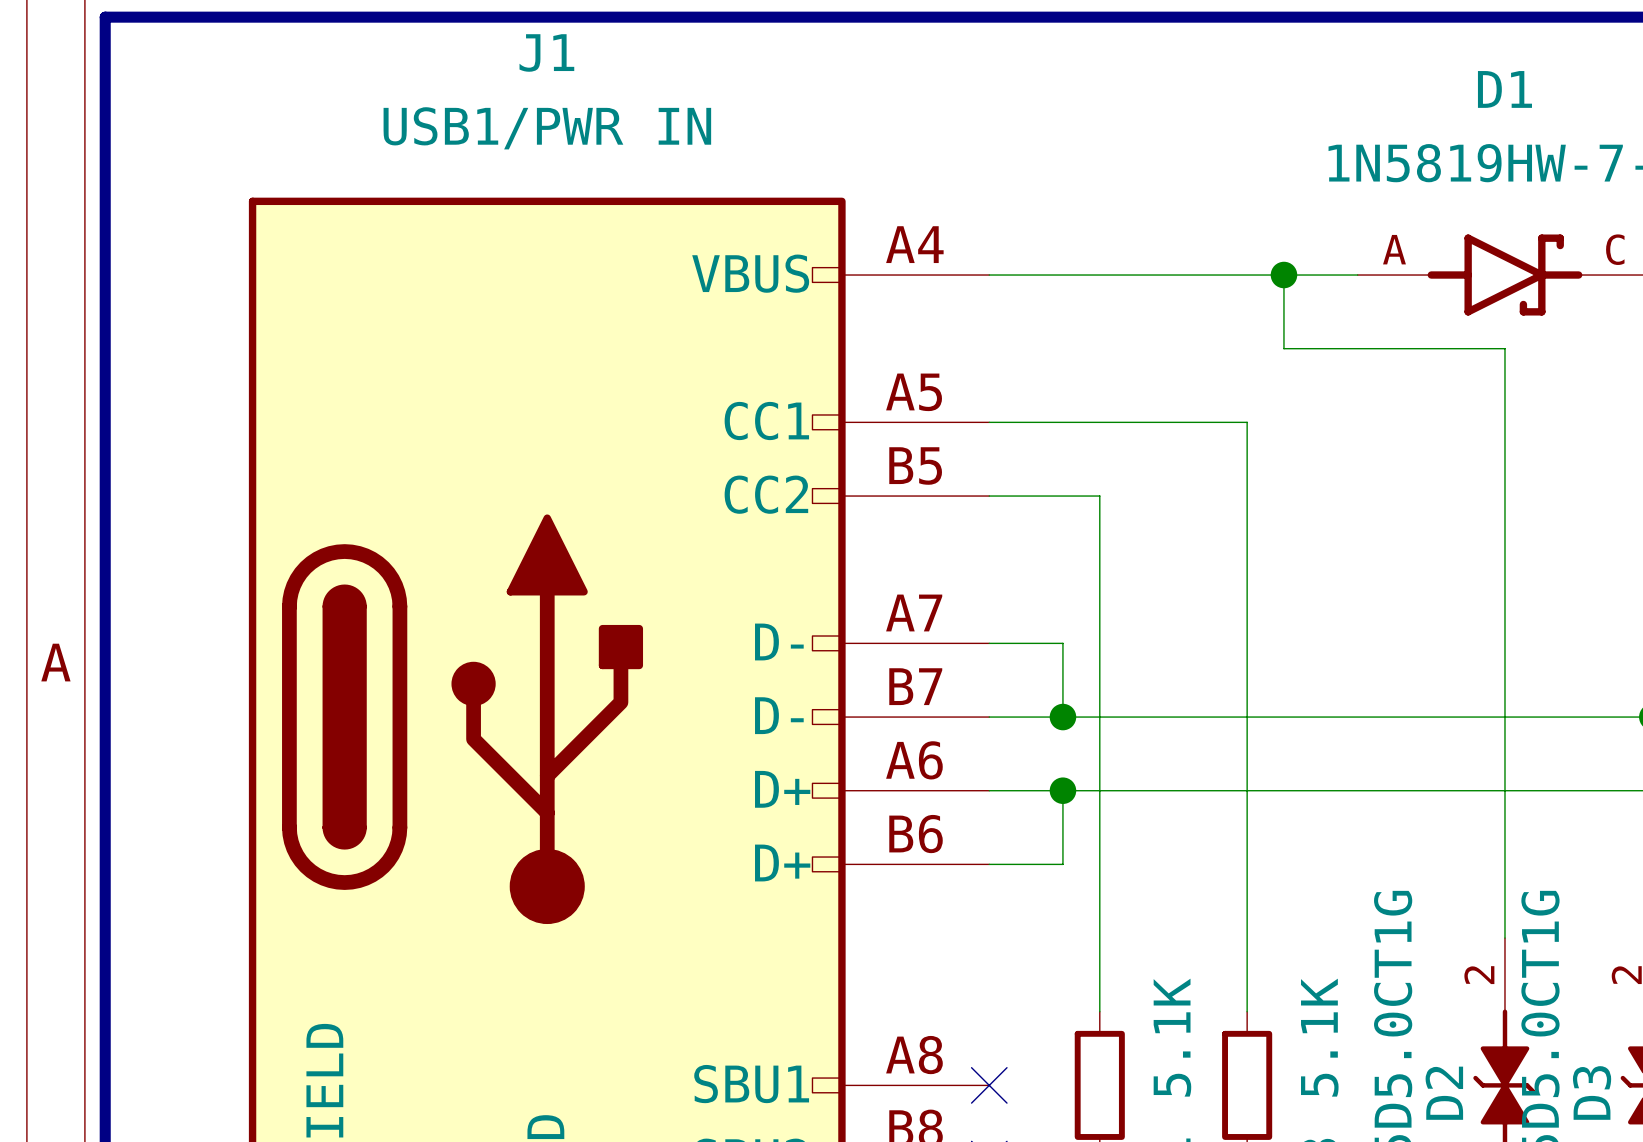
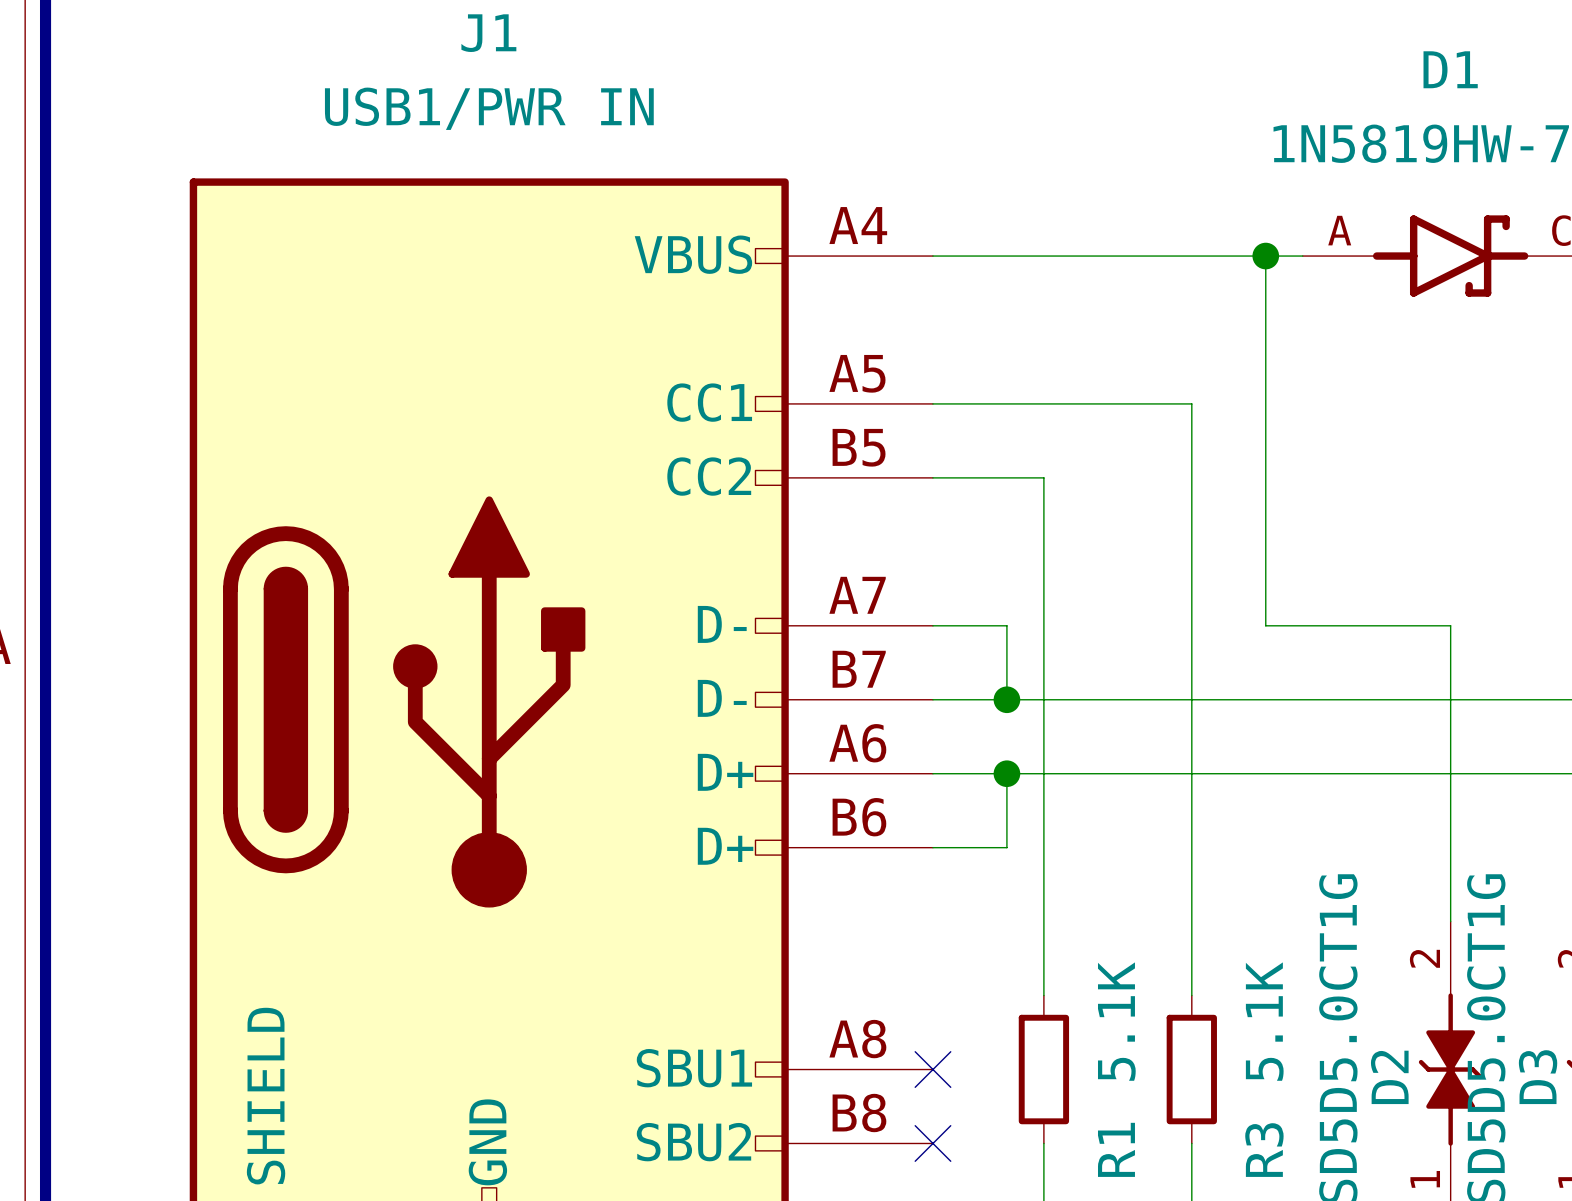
wire: (1283, 275) (1283, 348) (1504, 348) (1504, 643) -> (1265, 256) (1265, 625) (1450, 625)
junction position: (1283, 275) -> (1265, 256)

